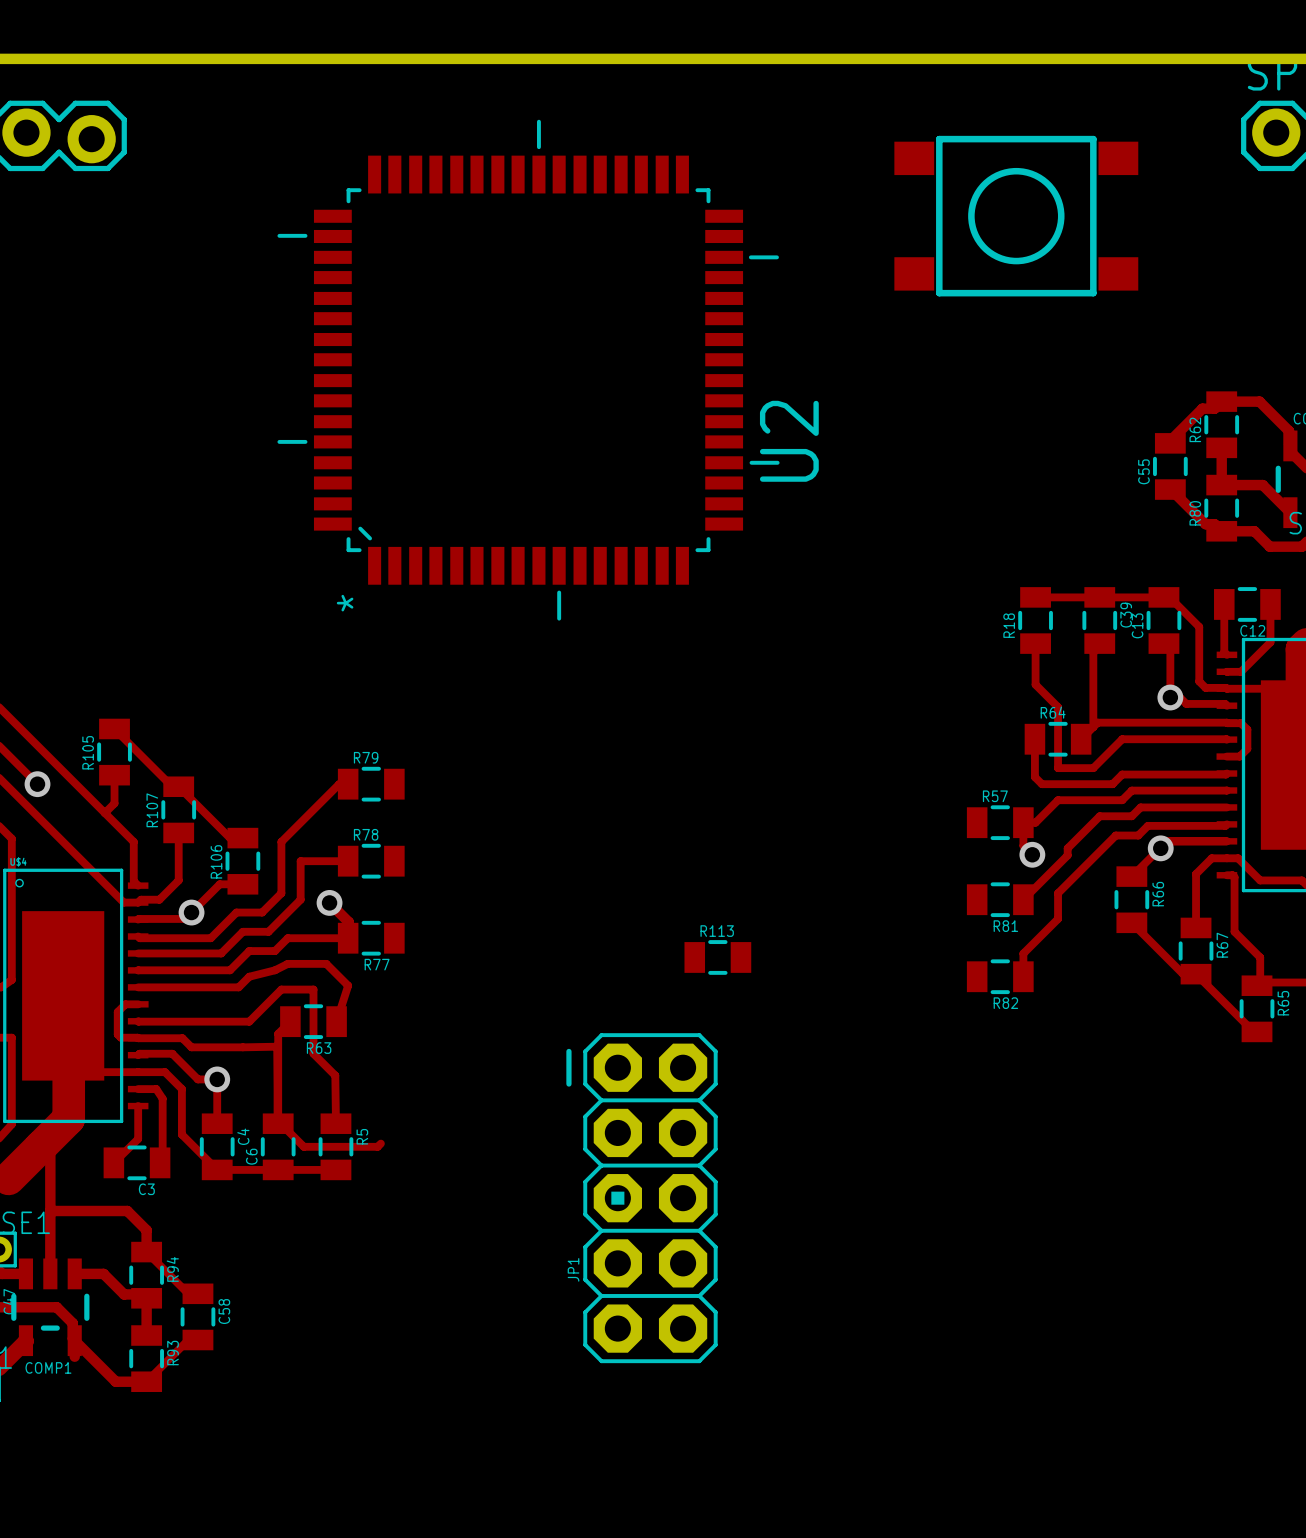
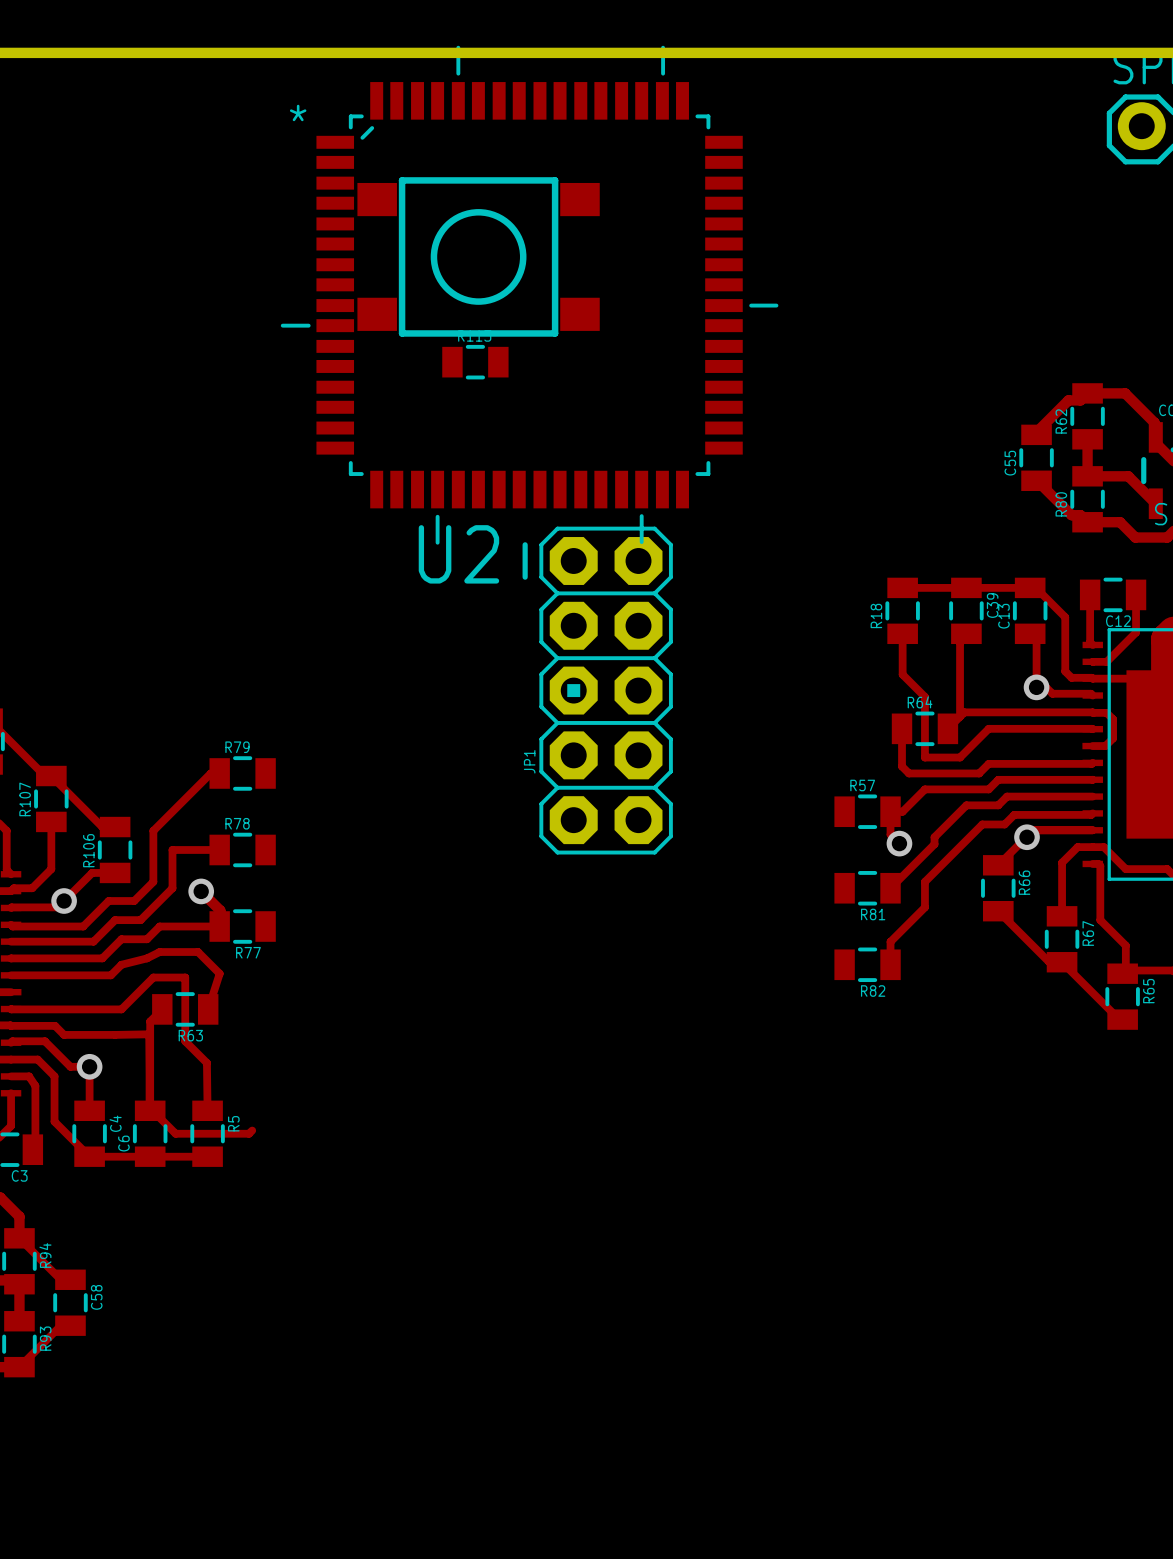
part position: (1016, 216) -> (478, 256)
U2 rotation: 0° (528, 370) -> 90° clockwise (529, 295)
R113 position: (717, 957) -> (475, 362)
JP1 position: (641, 1198) -> (597, 690)

